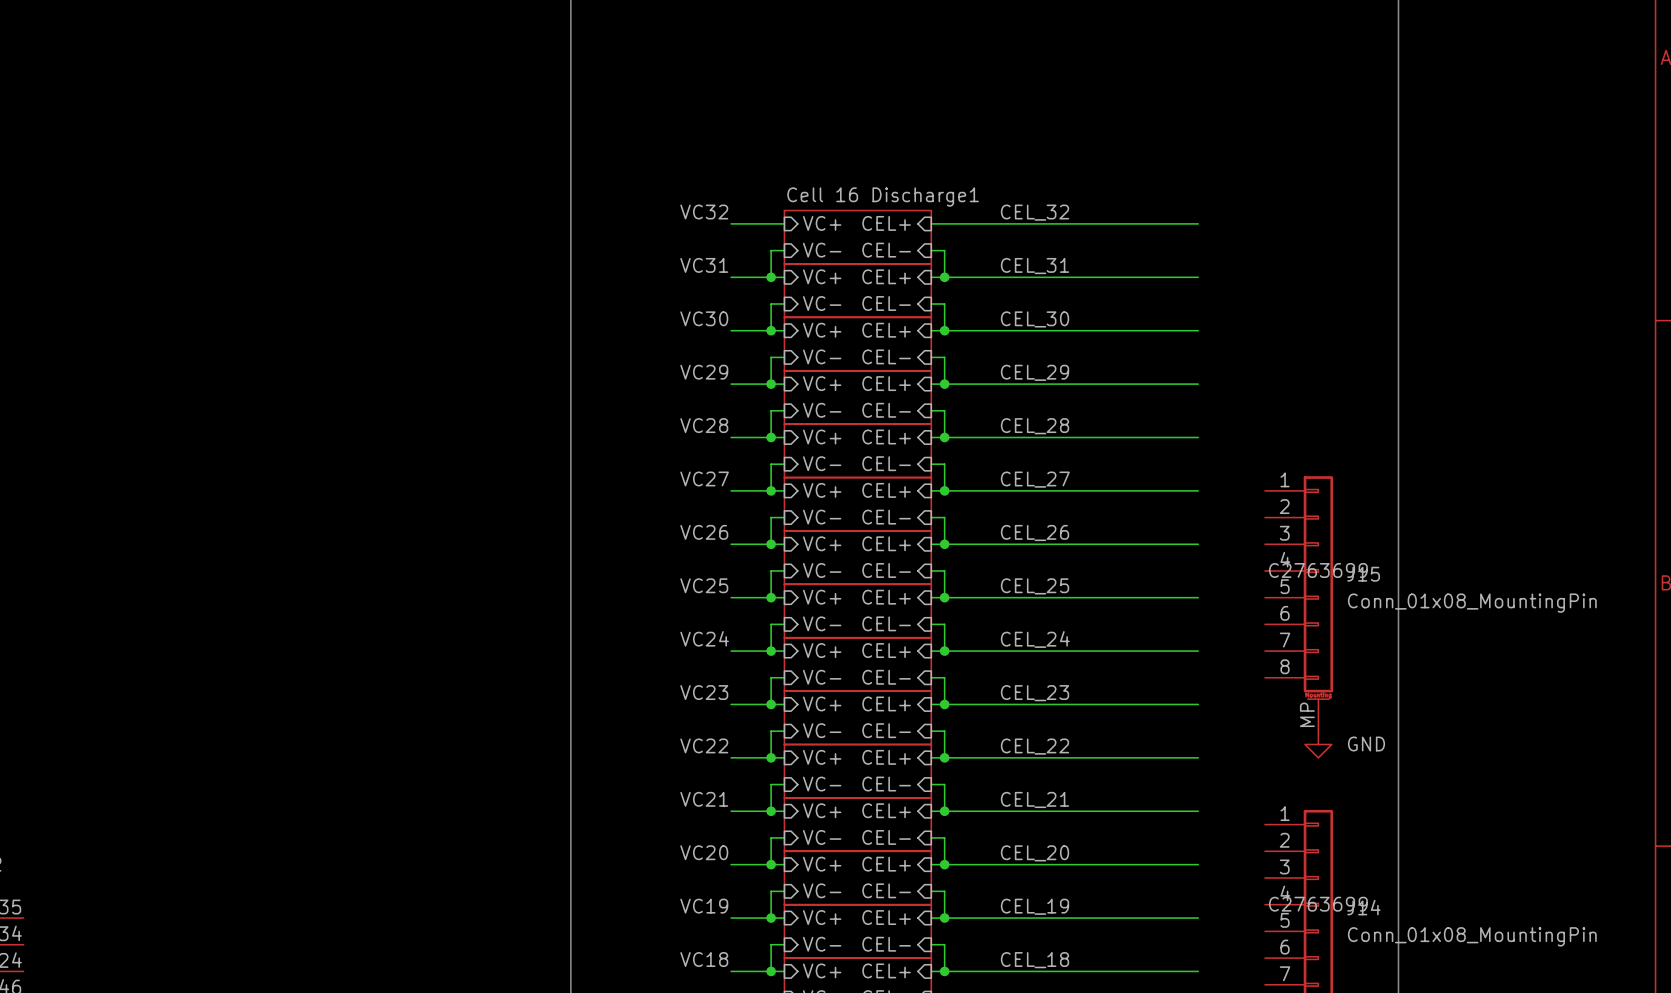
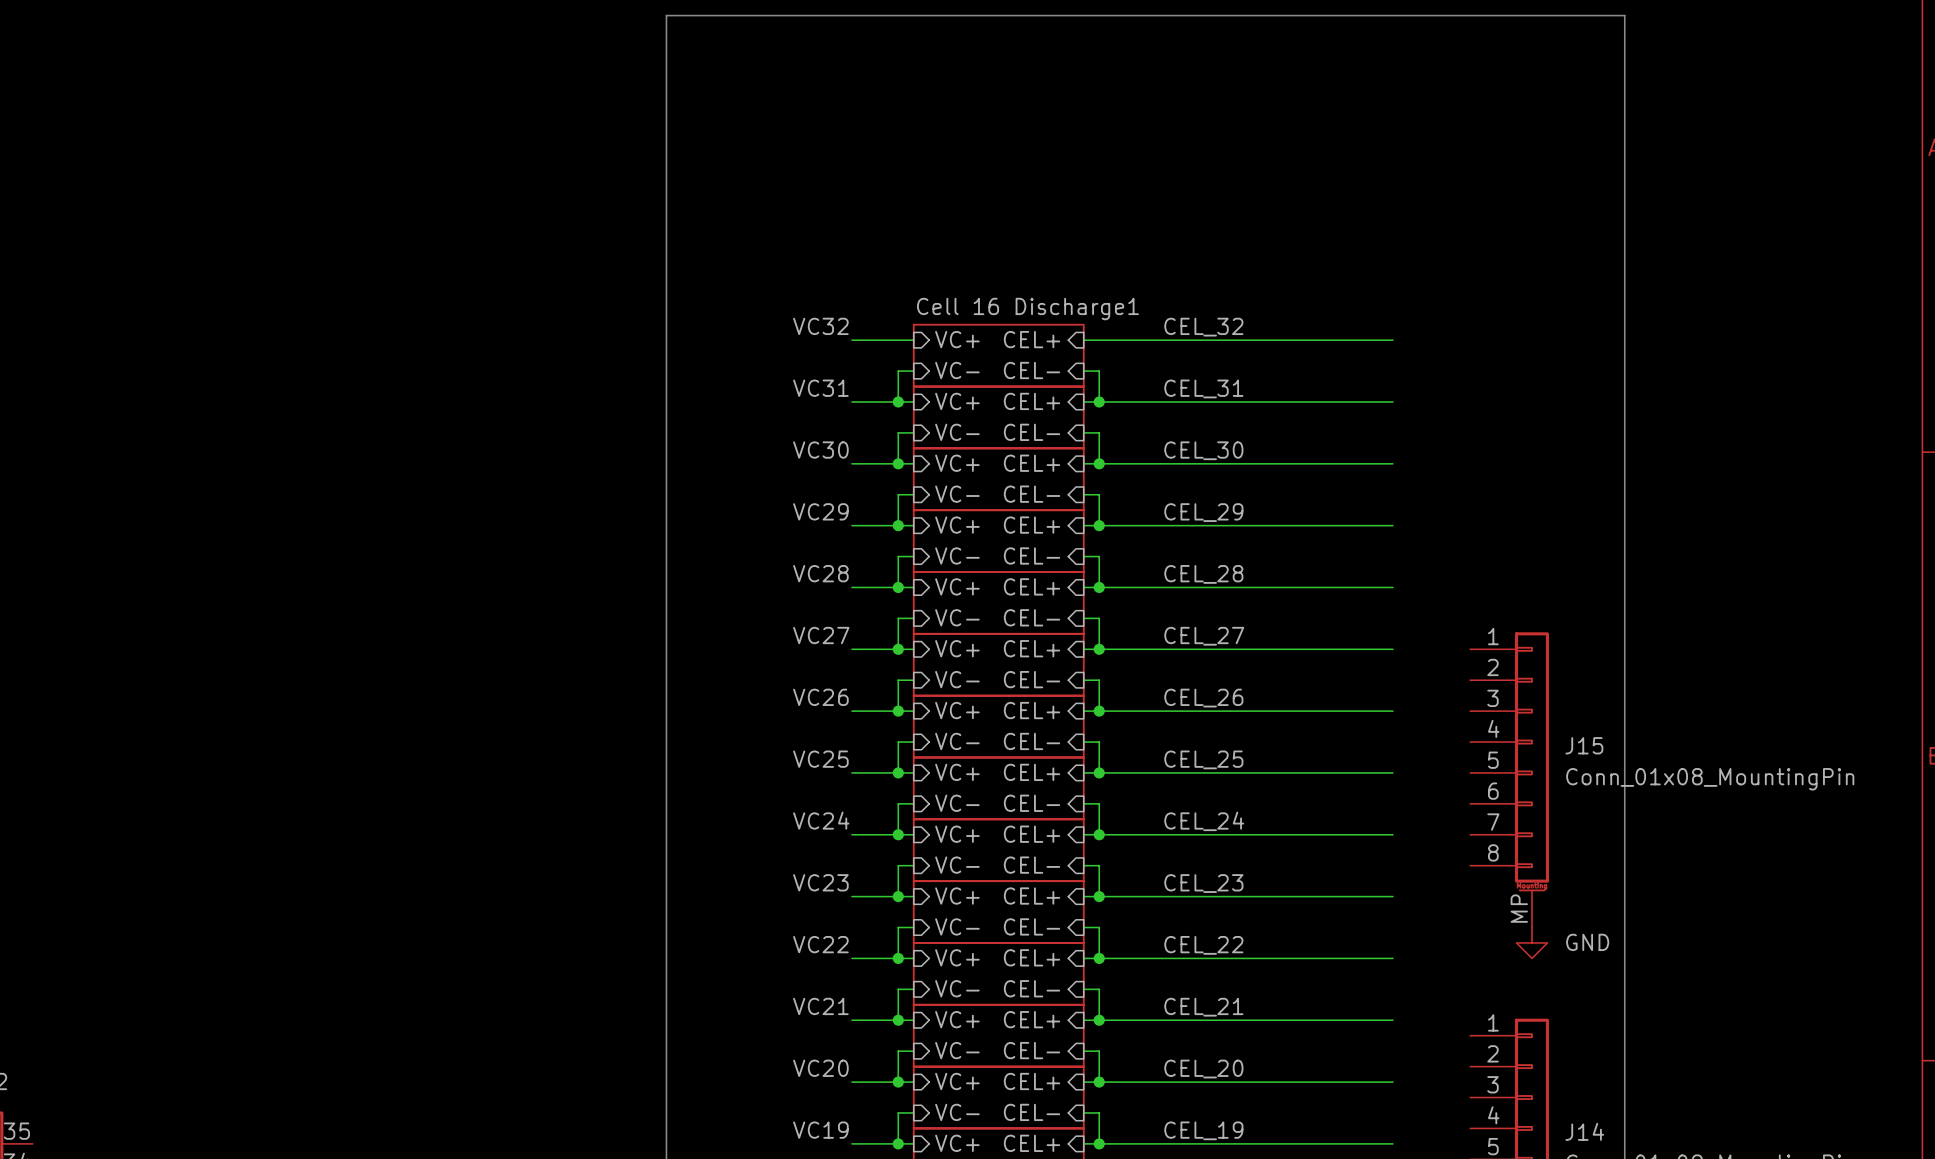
J15 text: C2763699 (1318, 570) -> none
J14 text: C2763699 (1318, 904) -> none

